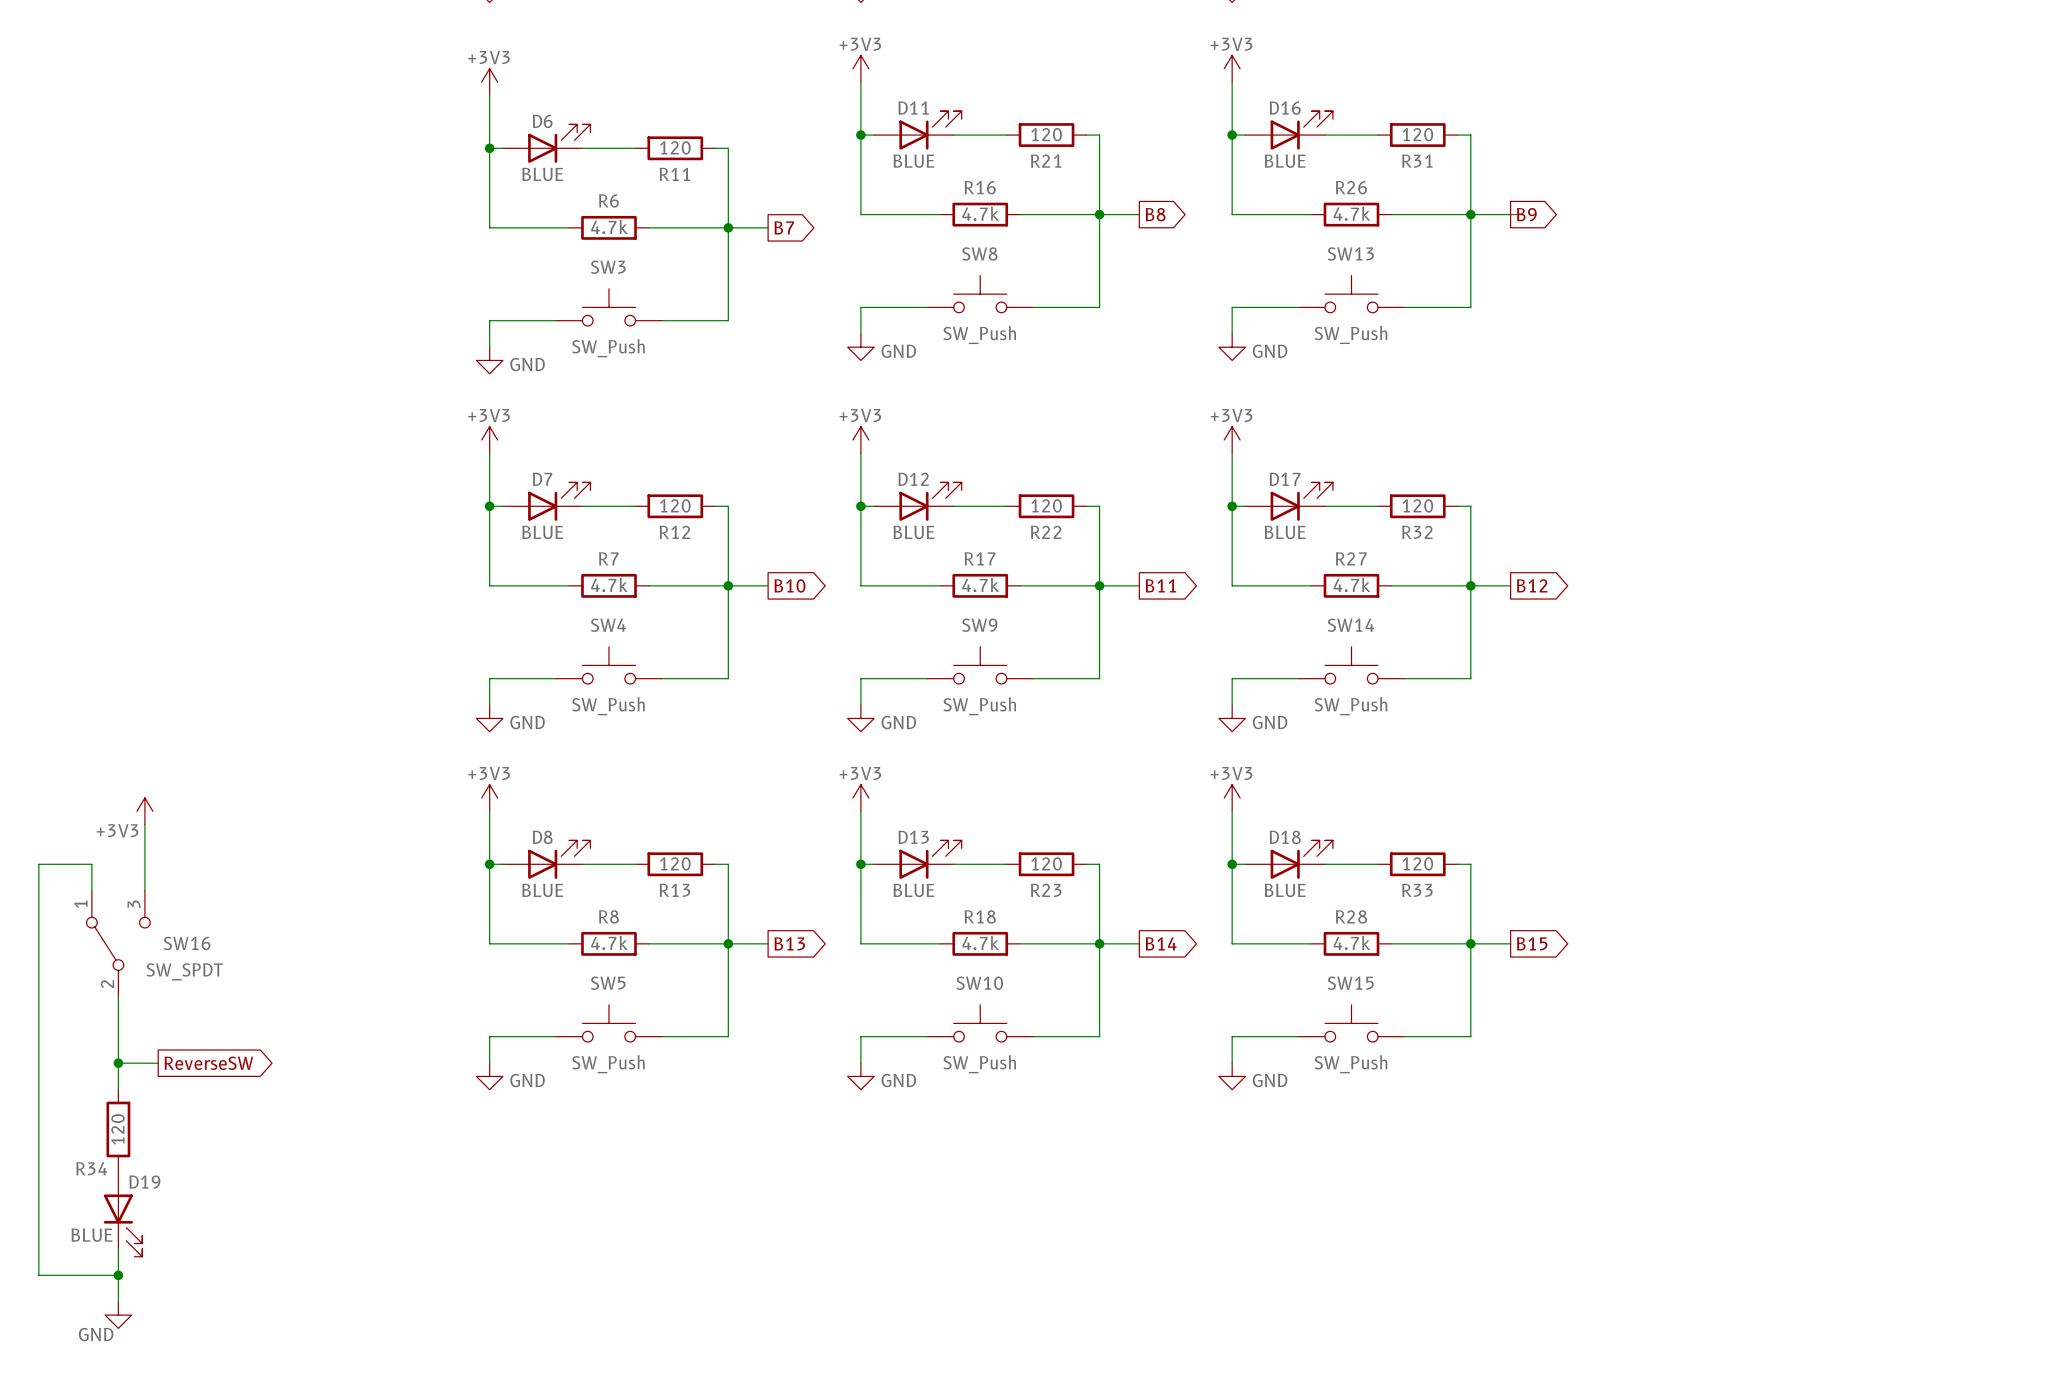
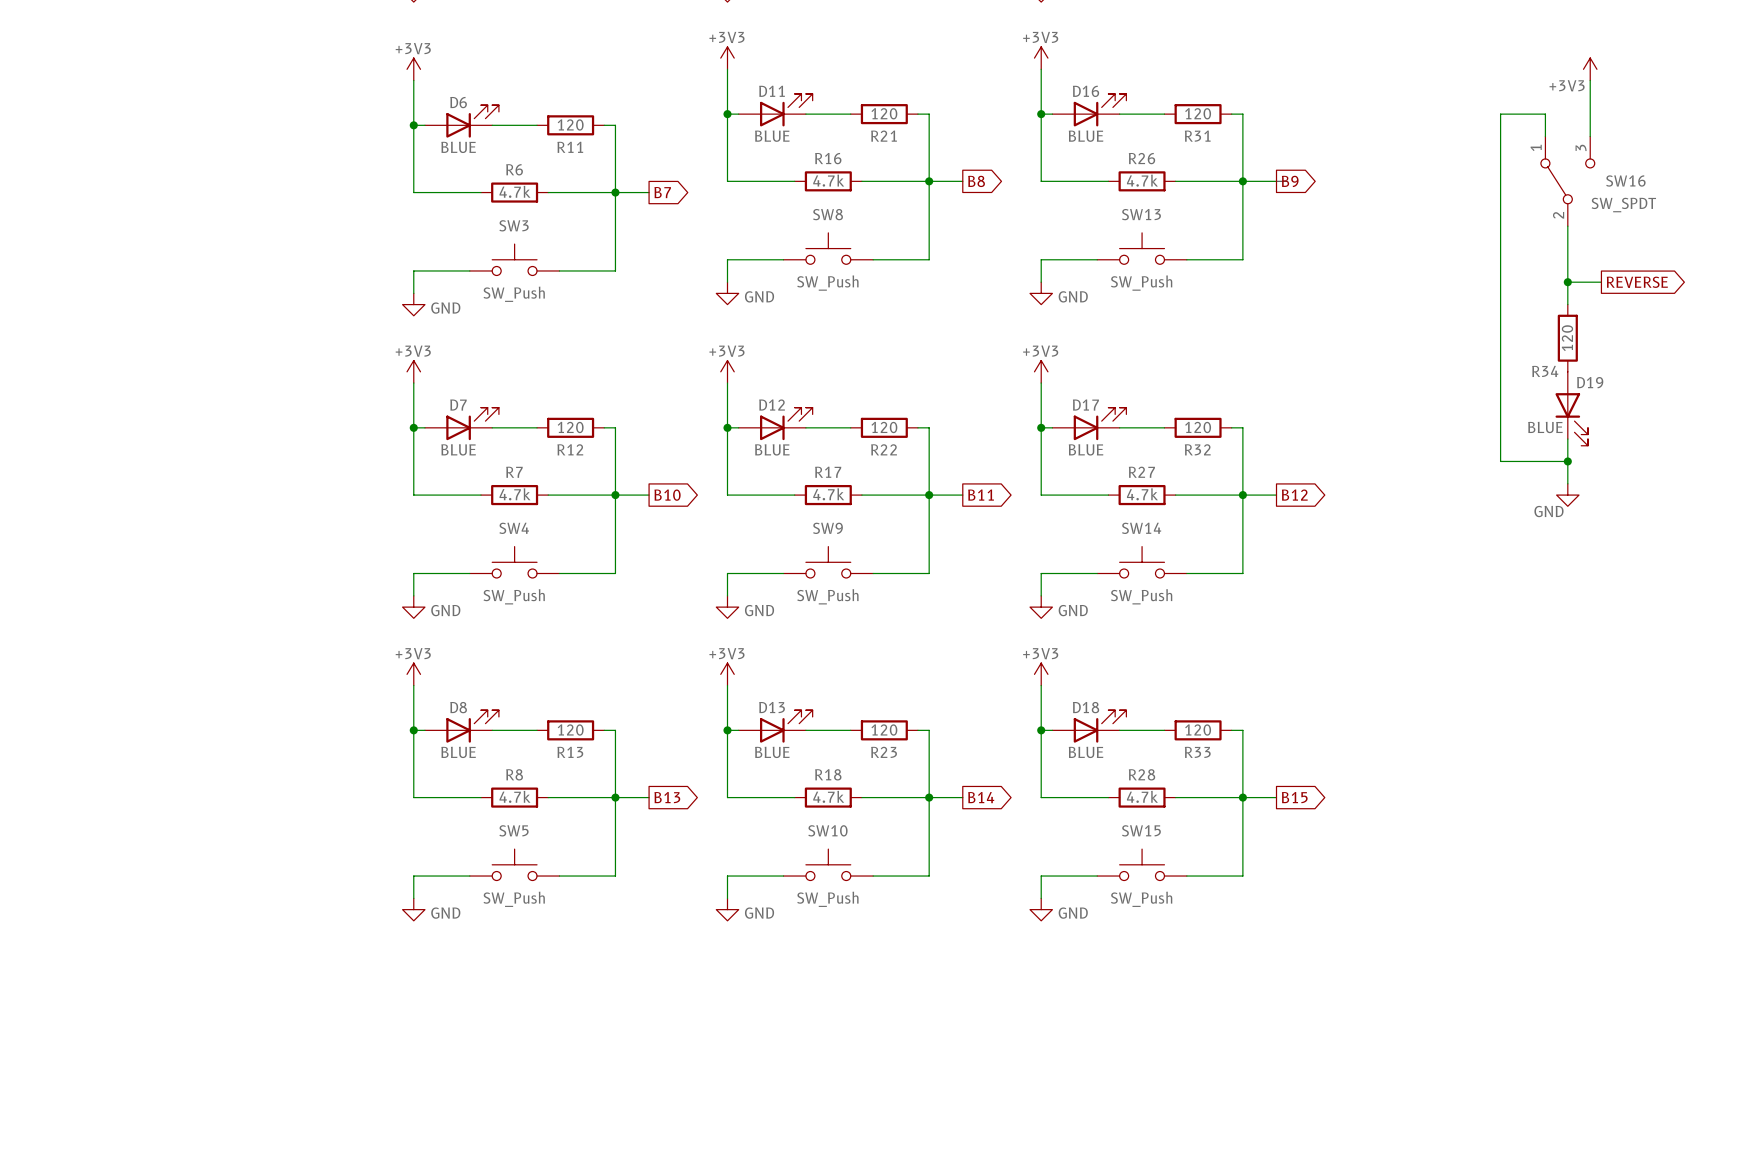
power symbol: none -> +3V3 (1590, 69)
wire: none -> (1590, 80) (1590, 136)
wire: none -> (1545, 136) (1545, 114) (1500, 114) (1500, 461) (1567, 461)
wire: none -> (1567, 226) (1567, 304)
wire: none -> (1567, 282) (1601, 282)
junction: none -> (1567, 282)
global label: none -> REVERSE (1637, 282)
wire: none -> (1567, 439) (1567, 483)
junction: none -> (1567, 461)
power symbol: none -> GND (1567, 495)
power symbol: +3V3 (144, 811) -> none
wire: (144, 824) (144, 890) -> none
wire: (91, 890) (91, 864) (38, 864) (38, 1275) (118, 1275) -> none
SW16 position: (118, 943) -> (1567, 181)
wire: (118, 996) (118, 1089) -> none
wire: (118, 1063) (158, 1063) -> none
junction: (118, 1063) -> none
global label: ReverseSW (208, 1063) -> none
R34 position: (118, 1129) -> (1567, 338)
D19 position: (123, 1213) -> (1571, 408)
wire: (118, 1248) (118, 1301) -> none
junction: (118, 1275) -> none
power symbol: GND (118, 1315) -> none

